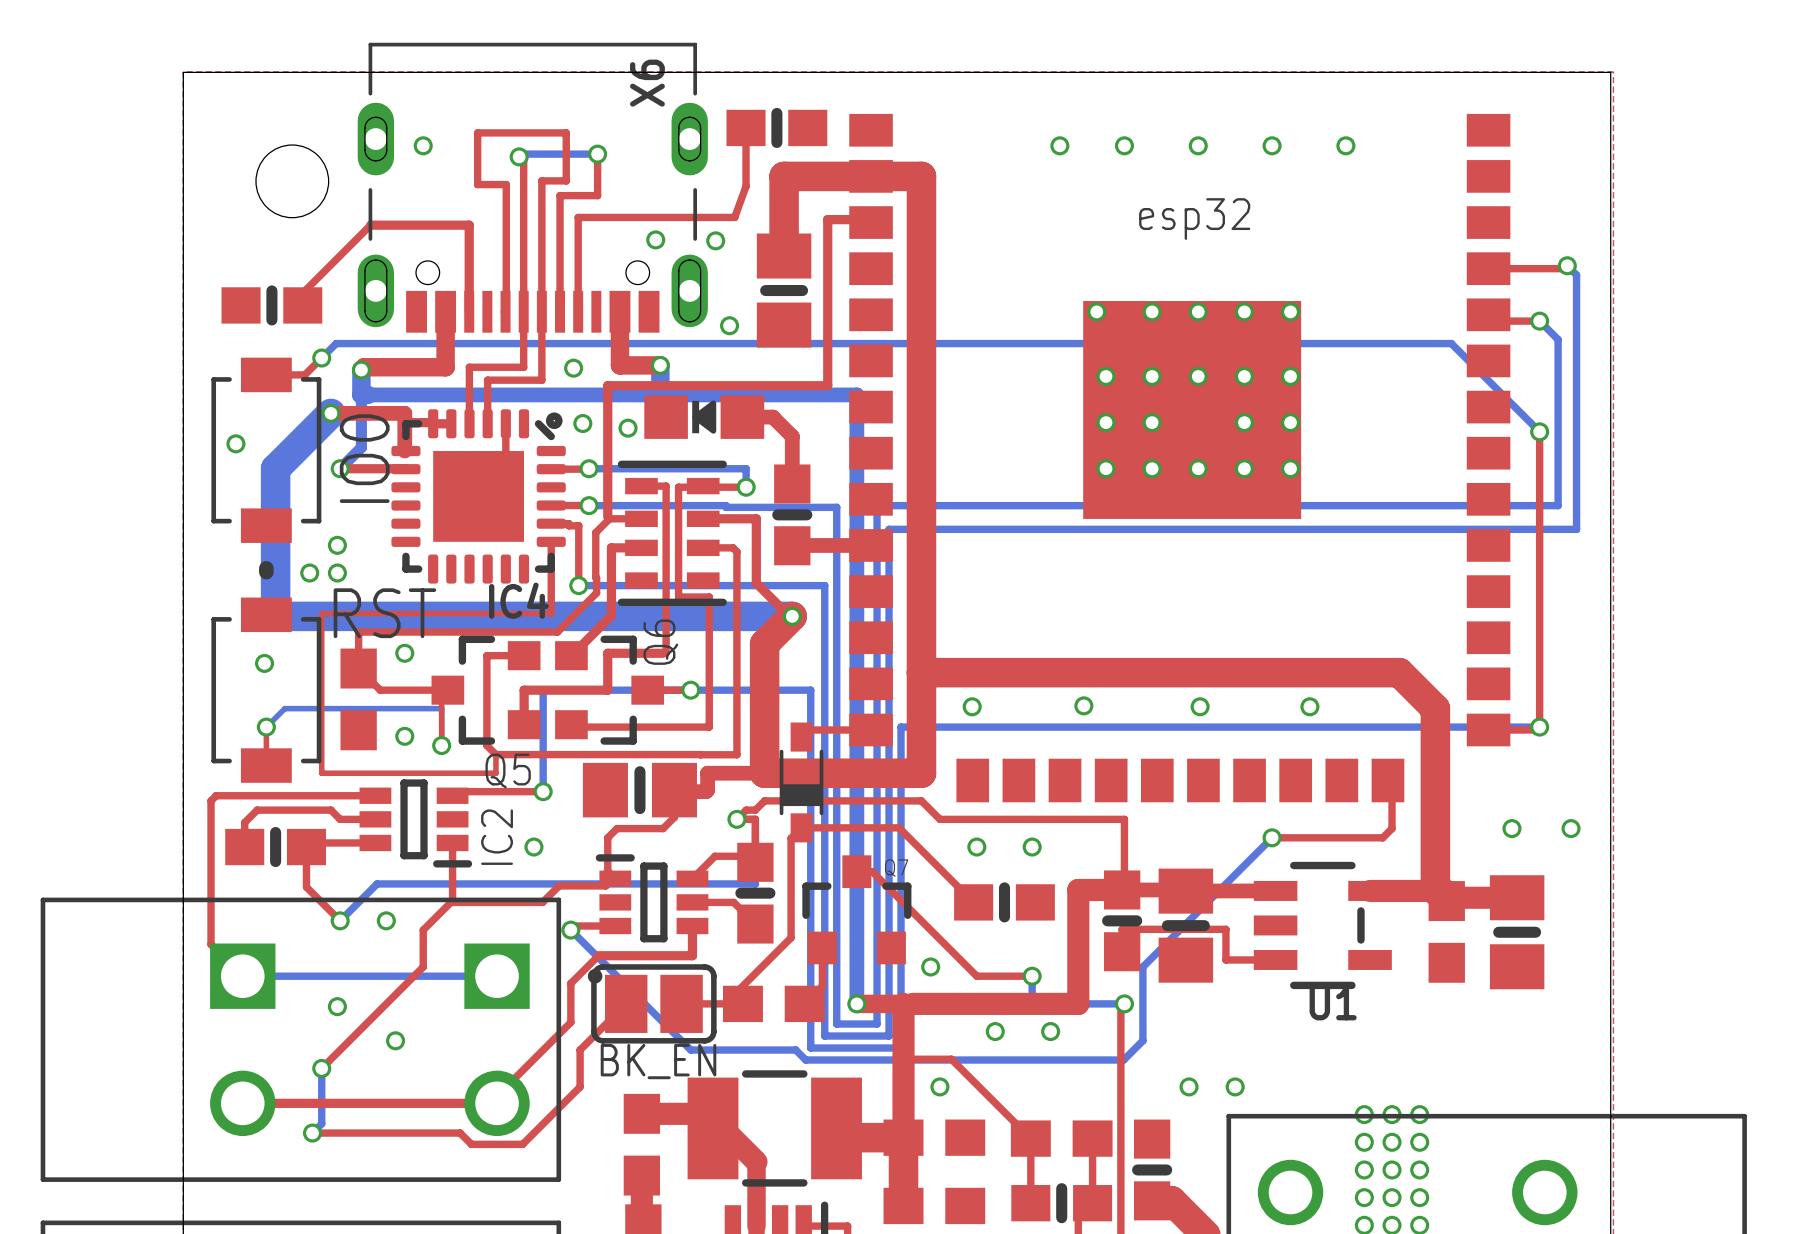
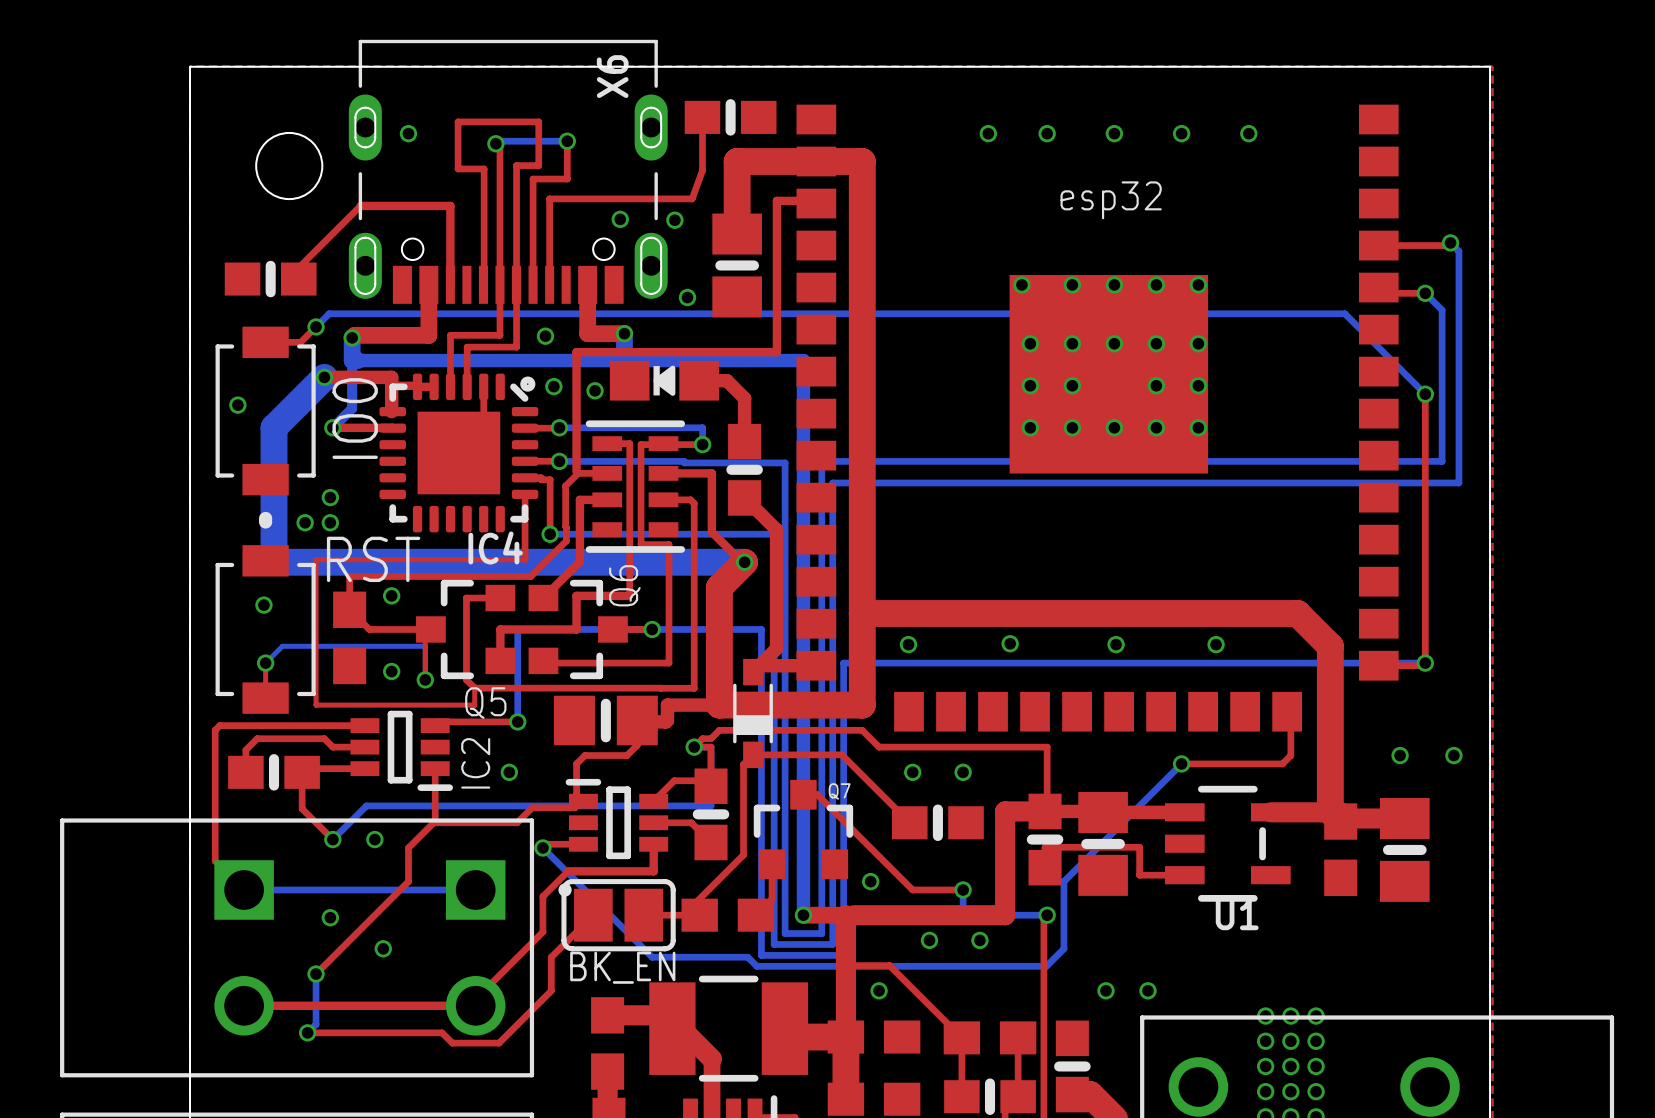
top track: (792, 545) (871, 545) -> (744, 497) (776, 529) (776, 648) (753, 672)
top track width: thin (808, 730) (871, 730) -> thick (759, 665) (816, 665)

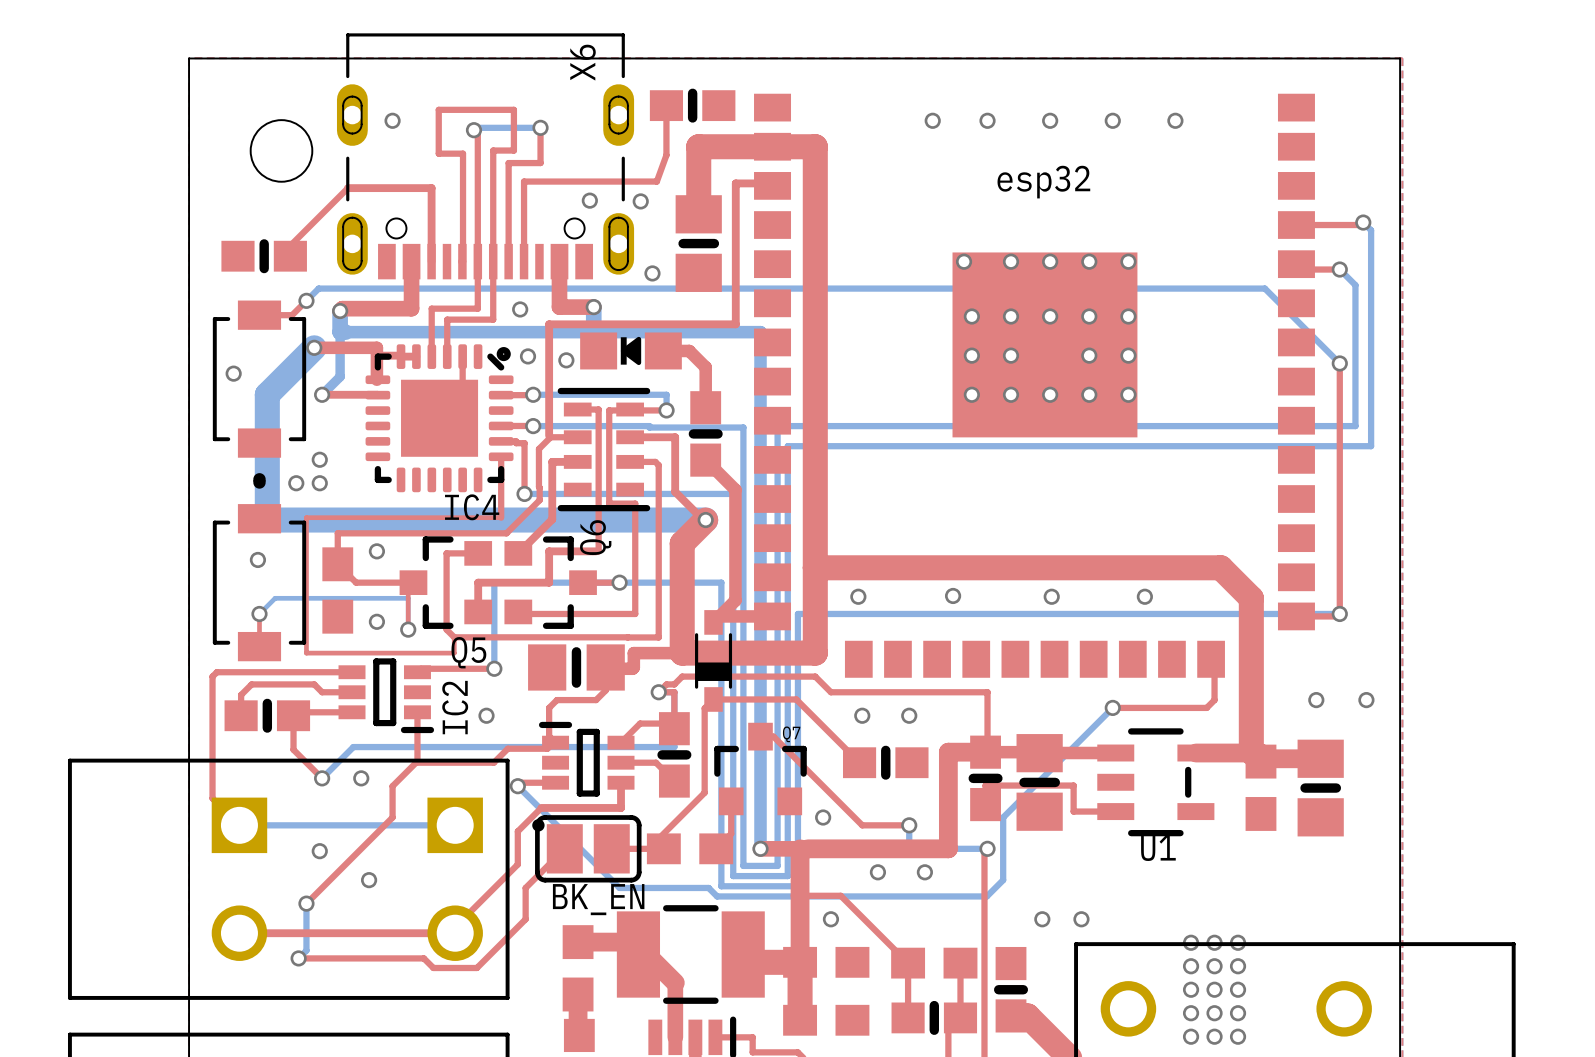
IO0 name: IO0 (355, 418) -> none
RST name: RST (373, 559) -> none

